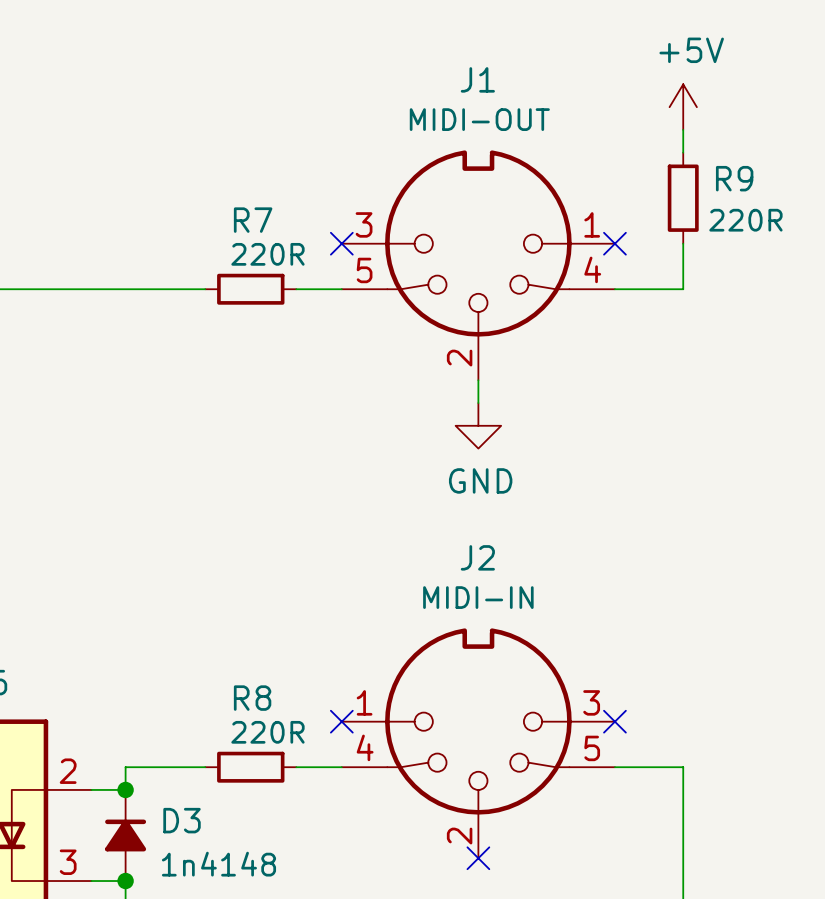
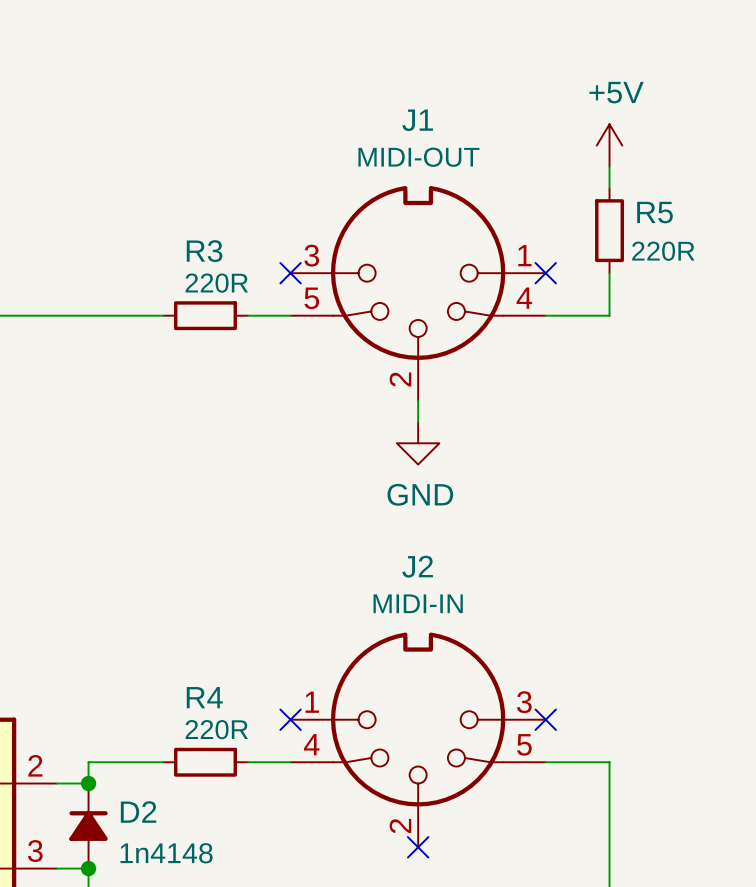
R9 name: R9 (734, 178) -> R5 (654, 212)
R7 name: R7 (253, 220) -> R3 (204, 251)
R8 name: R8 (252, 698) -> R4 (204, 697)
D3 name: D3 (182, 820) -> D2 (138, 811)

